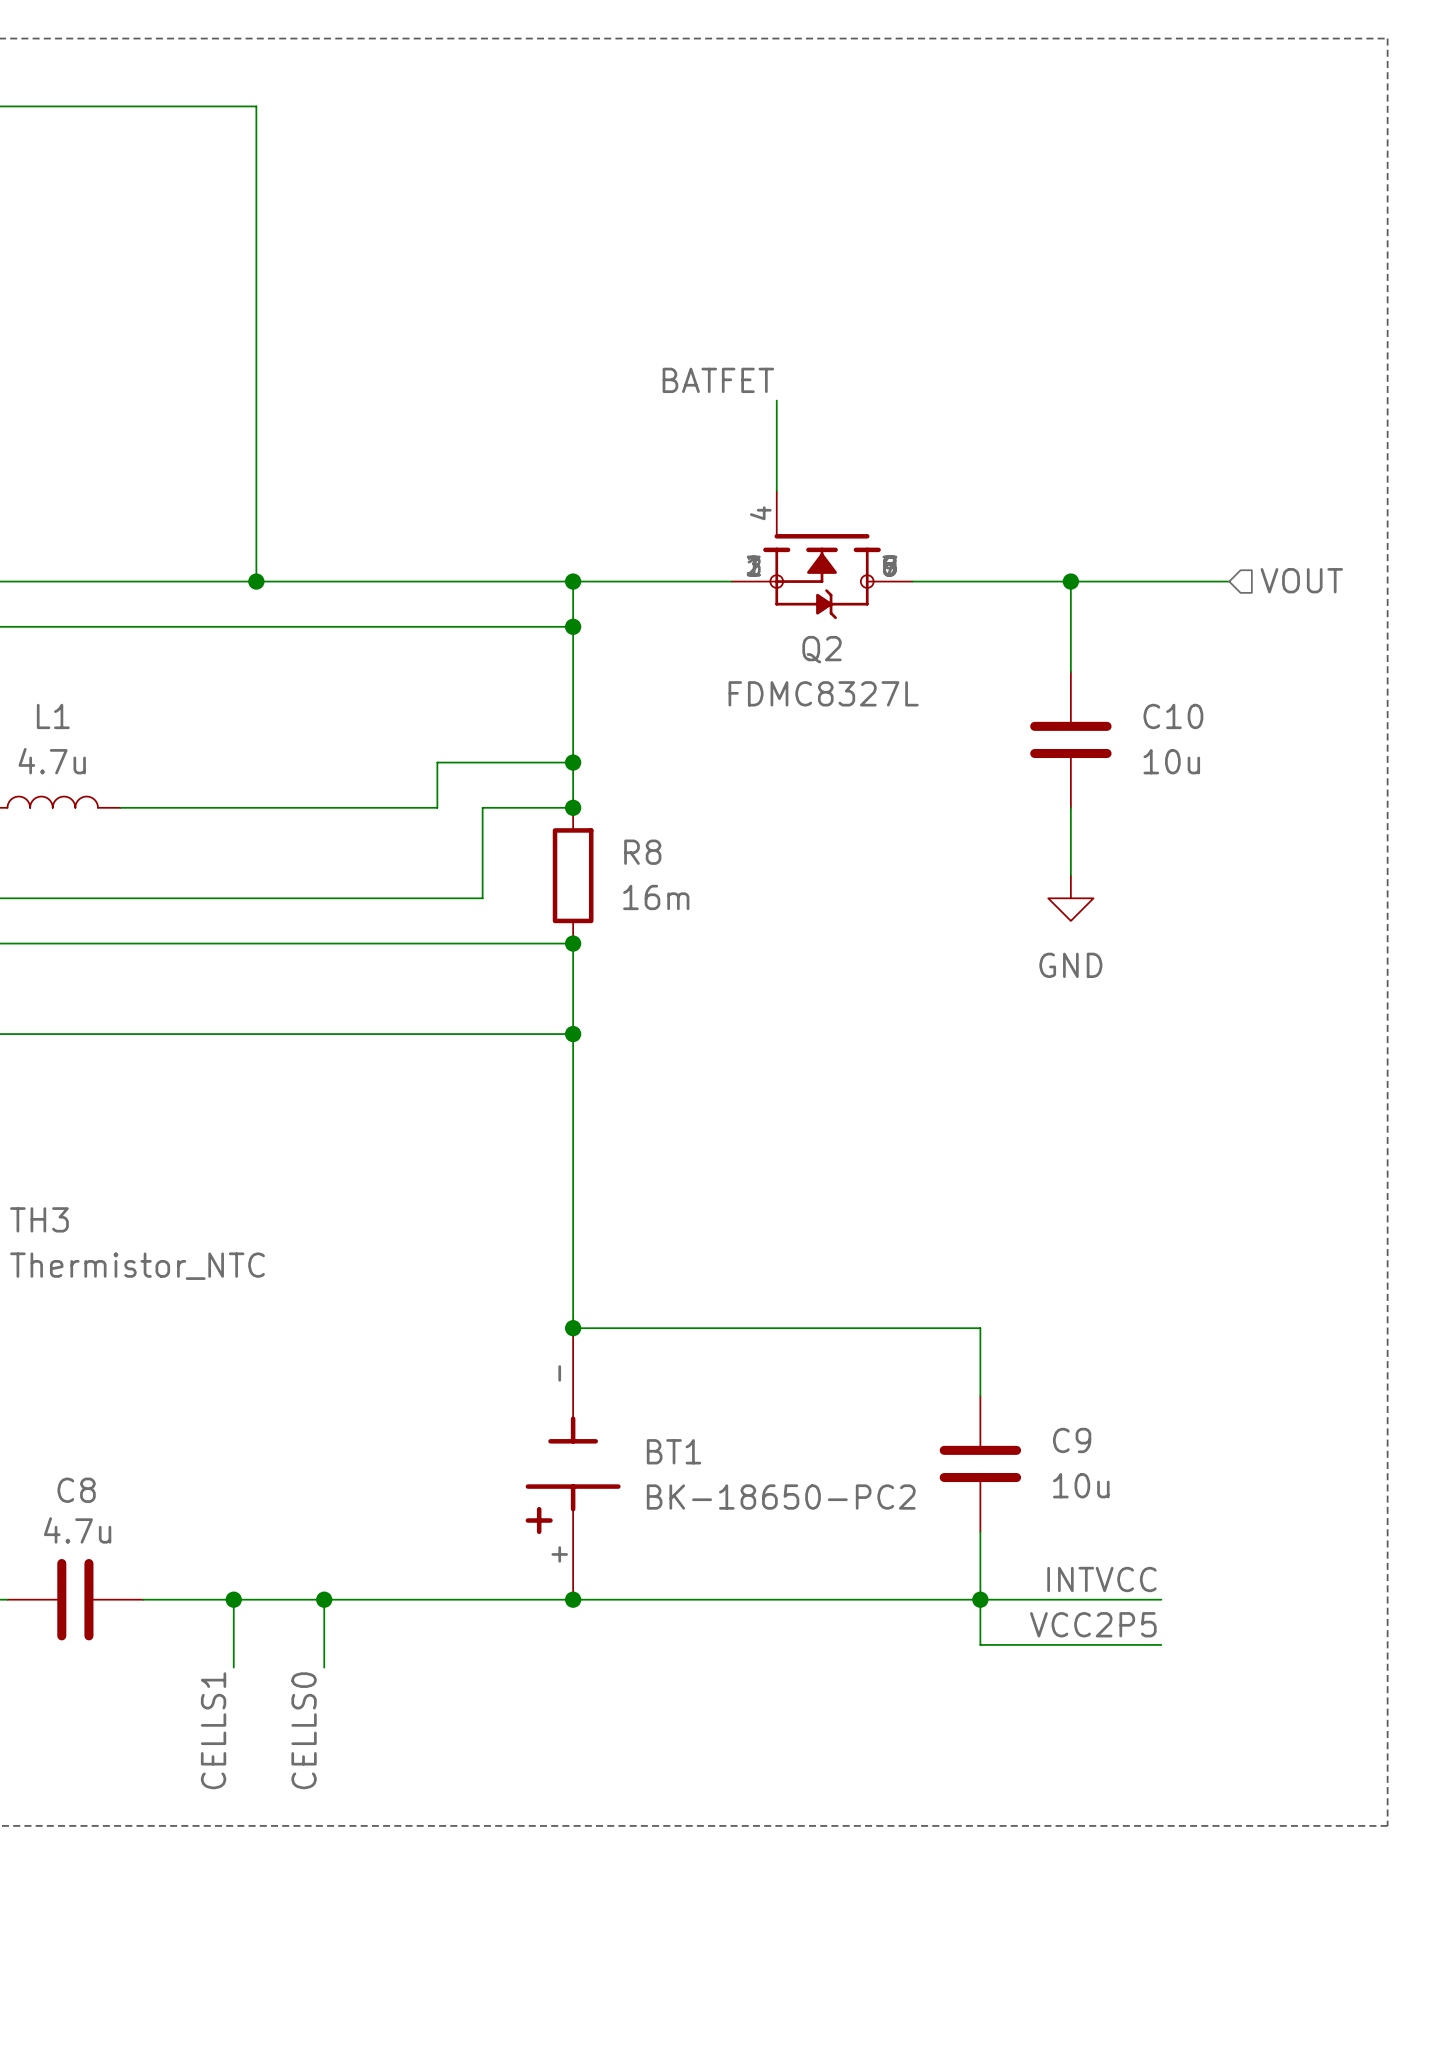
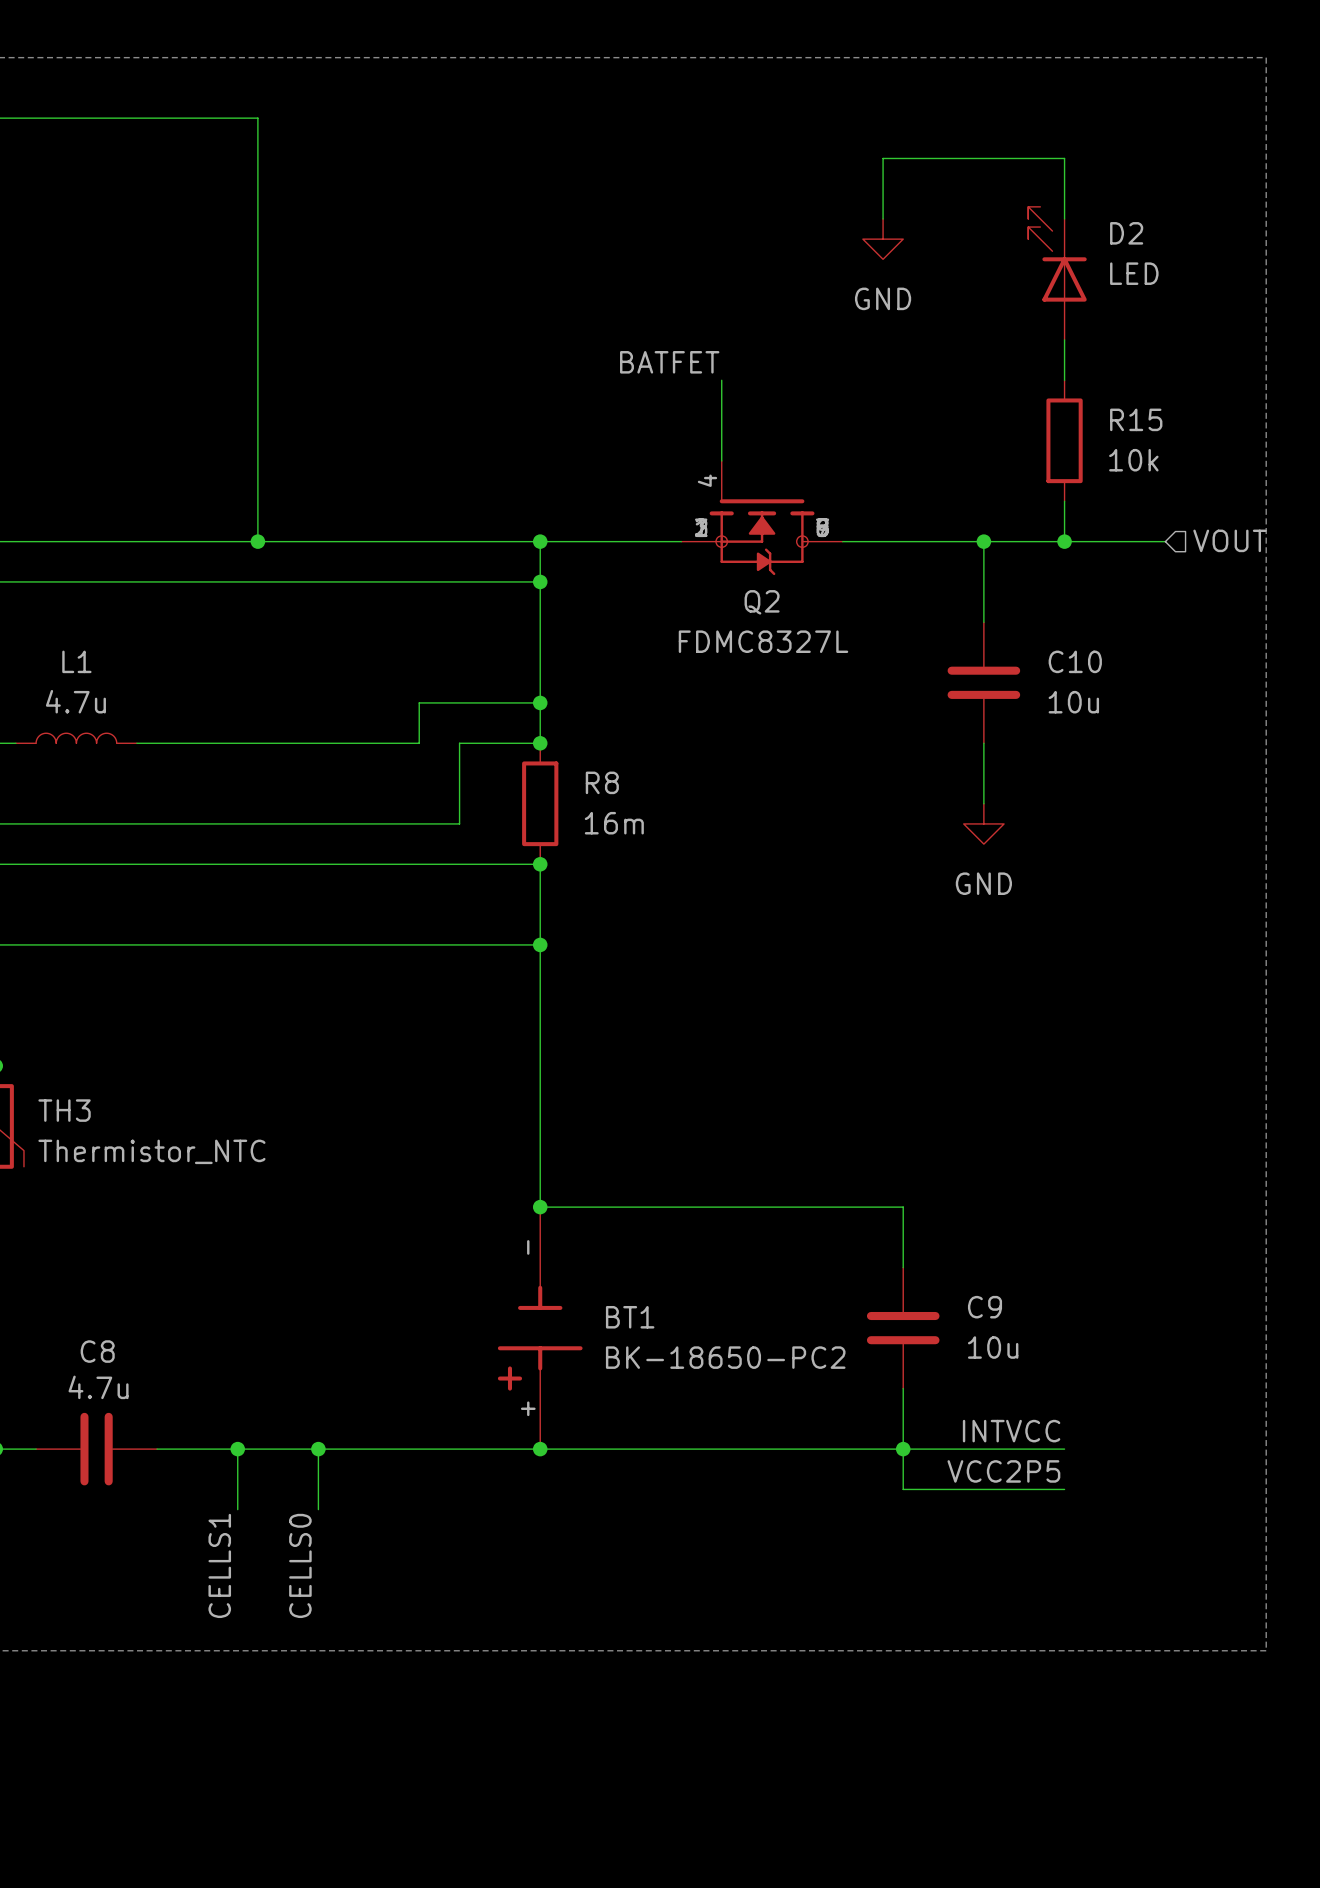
wire: none -> (883, 218) (883, 158) (1064, 158) (1064, 218)
power symbol: none -> GND (883, 239)
D2: none -> LED (1057, 273)
wire: none -> (1064, 339) (1064, 380)
R15: none -> 10k (1064, 440)
wire: none -> (1064, 501) (1064, 541)
hierarchical label position: VOUT (1301, 580) -> VOUT (1230, 540)
junction: none -> (1064, 541)
wire: none -> (1125, 541) (1165, 541)

